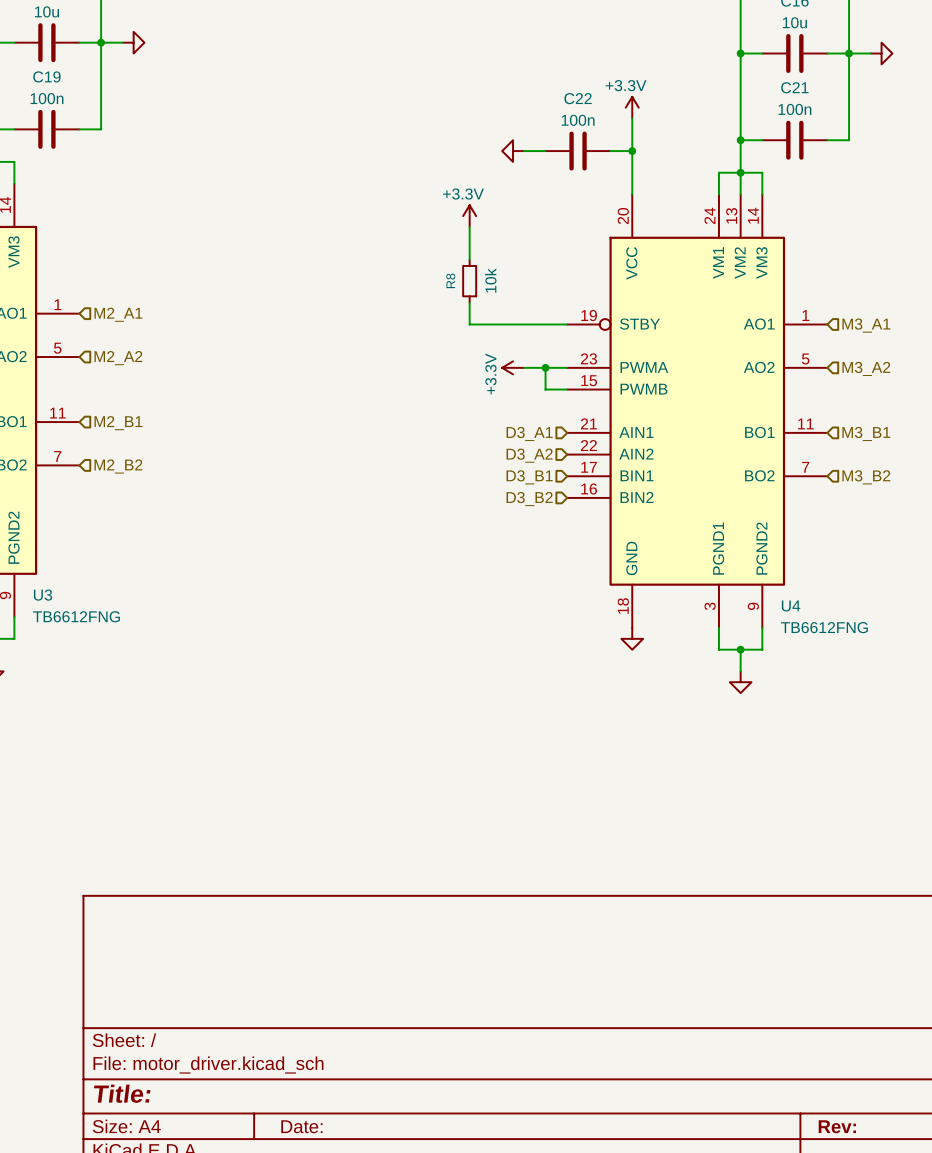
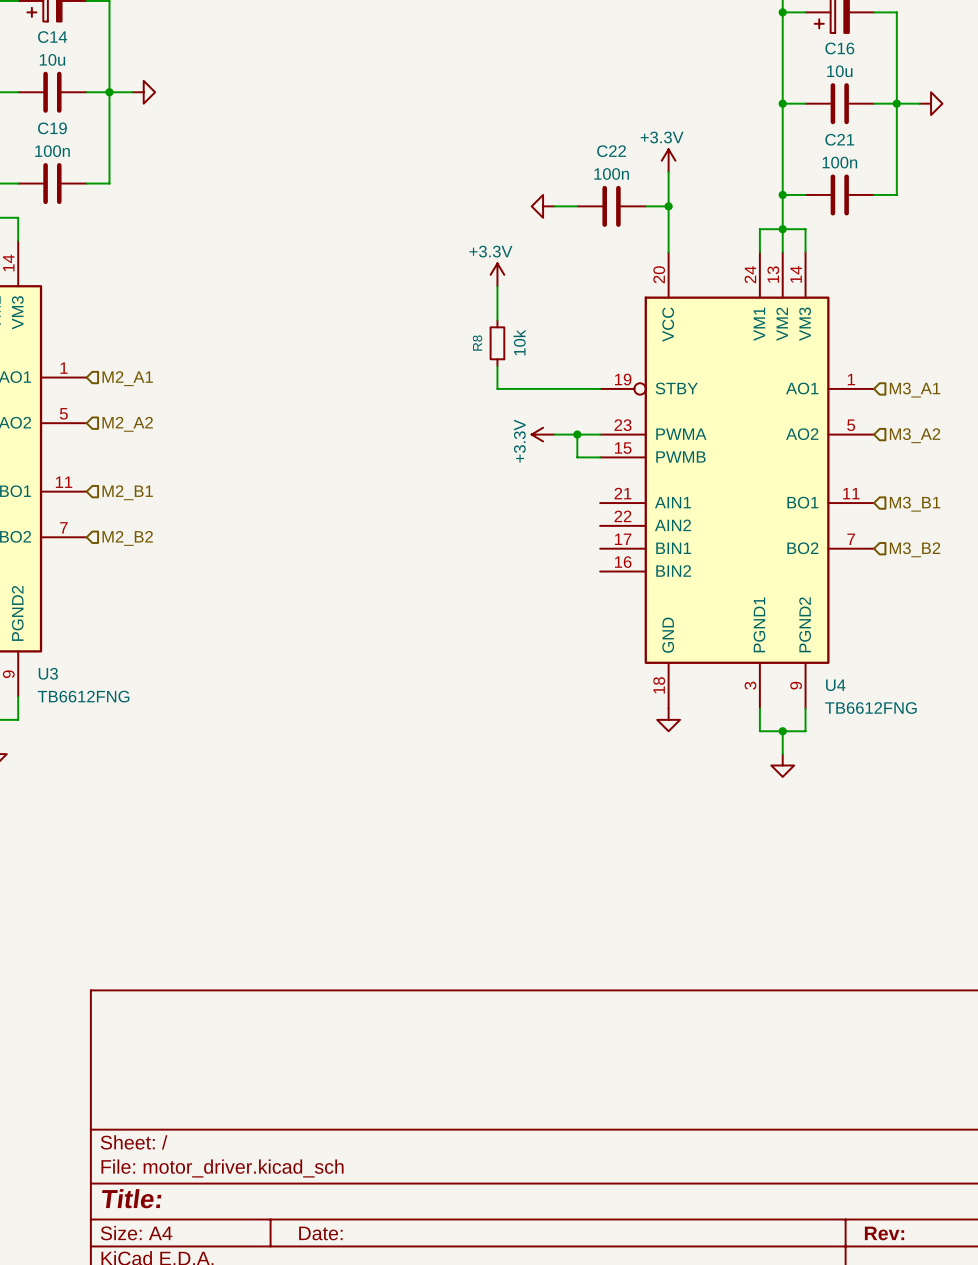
hierarchical label: D3_A1 (529, 433) -> none
hierarchical label: D3_A2 (529, 455) -> none
hierarchical label: D3_B1 (529, 477) -> none
hierarchical label: D3_B2 (529, 499) -> none

